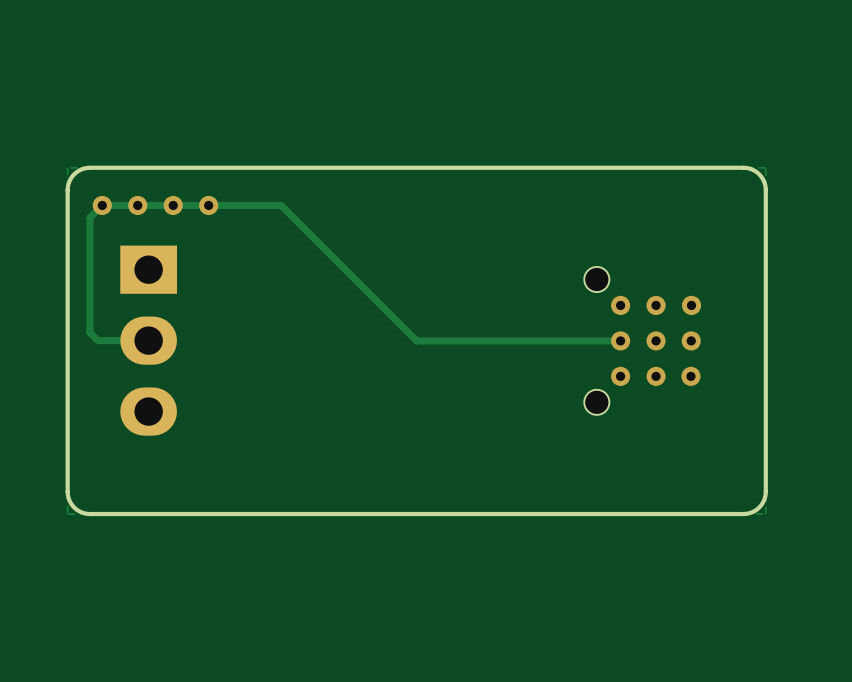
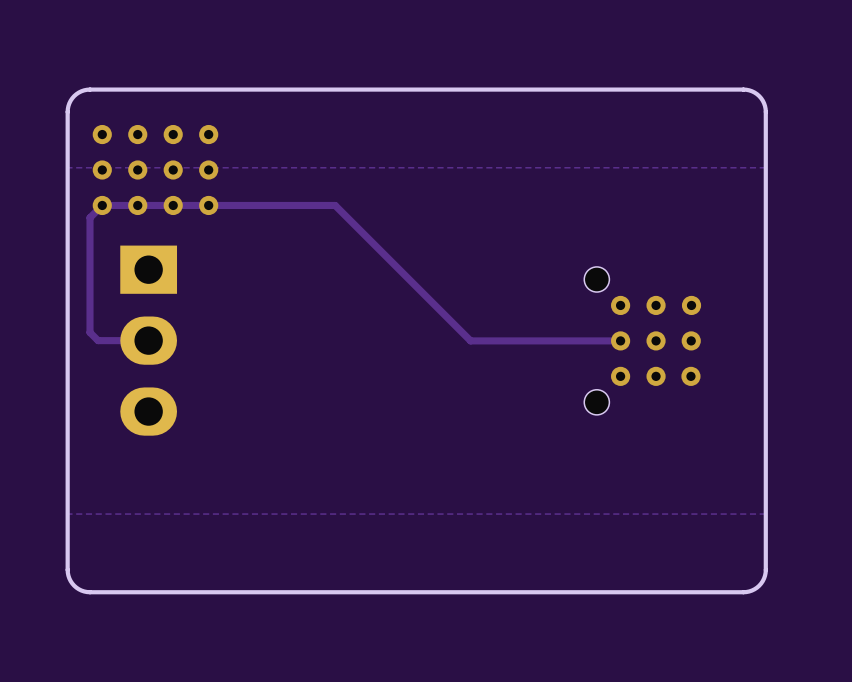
via: none -> (102, 134)
via: none -> (137, 134)
via: none -> (173, 134)
via: none -> (208, 134)
via: none -> (102, 170)
via: none -> (137, 170)
via: none -> (173, 170)
via: none -> (208, 170)
board edge: (765, 190) (764, 181) (759, 174) (752, 169) (743, 167) (90, 167) (81, 169) (74, 174) (69, 181) (67, 190) -> (765, 190) (765, 106) (757, 94) (743, 89) (87, 89) (74, 96) (67, 109) (67, 190)
track: (281, 205) (416, 340) (470, 340) -> (281, 205) (335, 205) (470, 340)
board edge: (765, 491) (764, 500) (759, 507) (752, 512) (743, 514) (90, 514) (81, 512) (74, 507) (69, 500) (67, 491) -> (765, 491) (765, 575) (757, 587) (743, 592) (87, 592) (74, 585) (67, 572) (67, 491)

